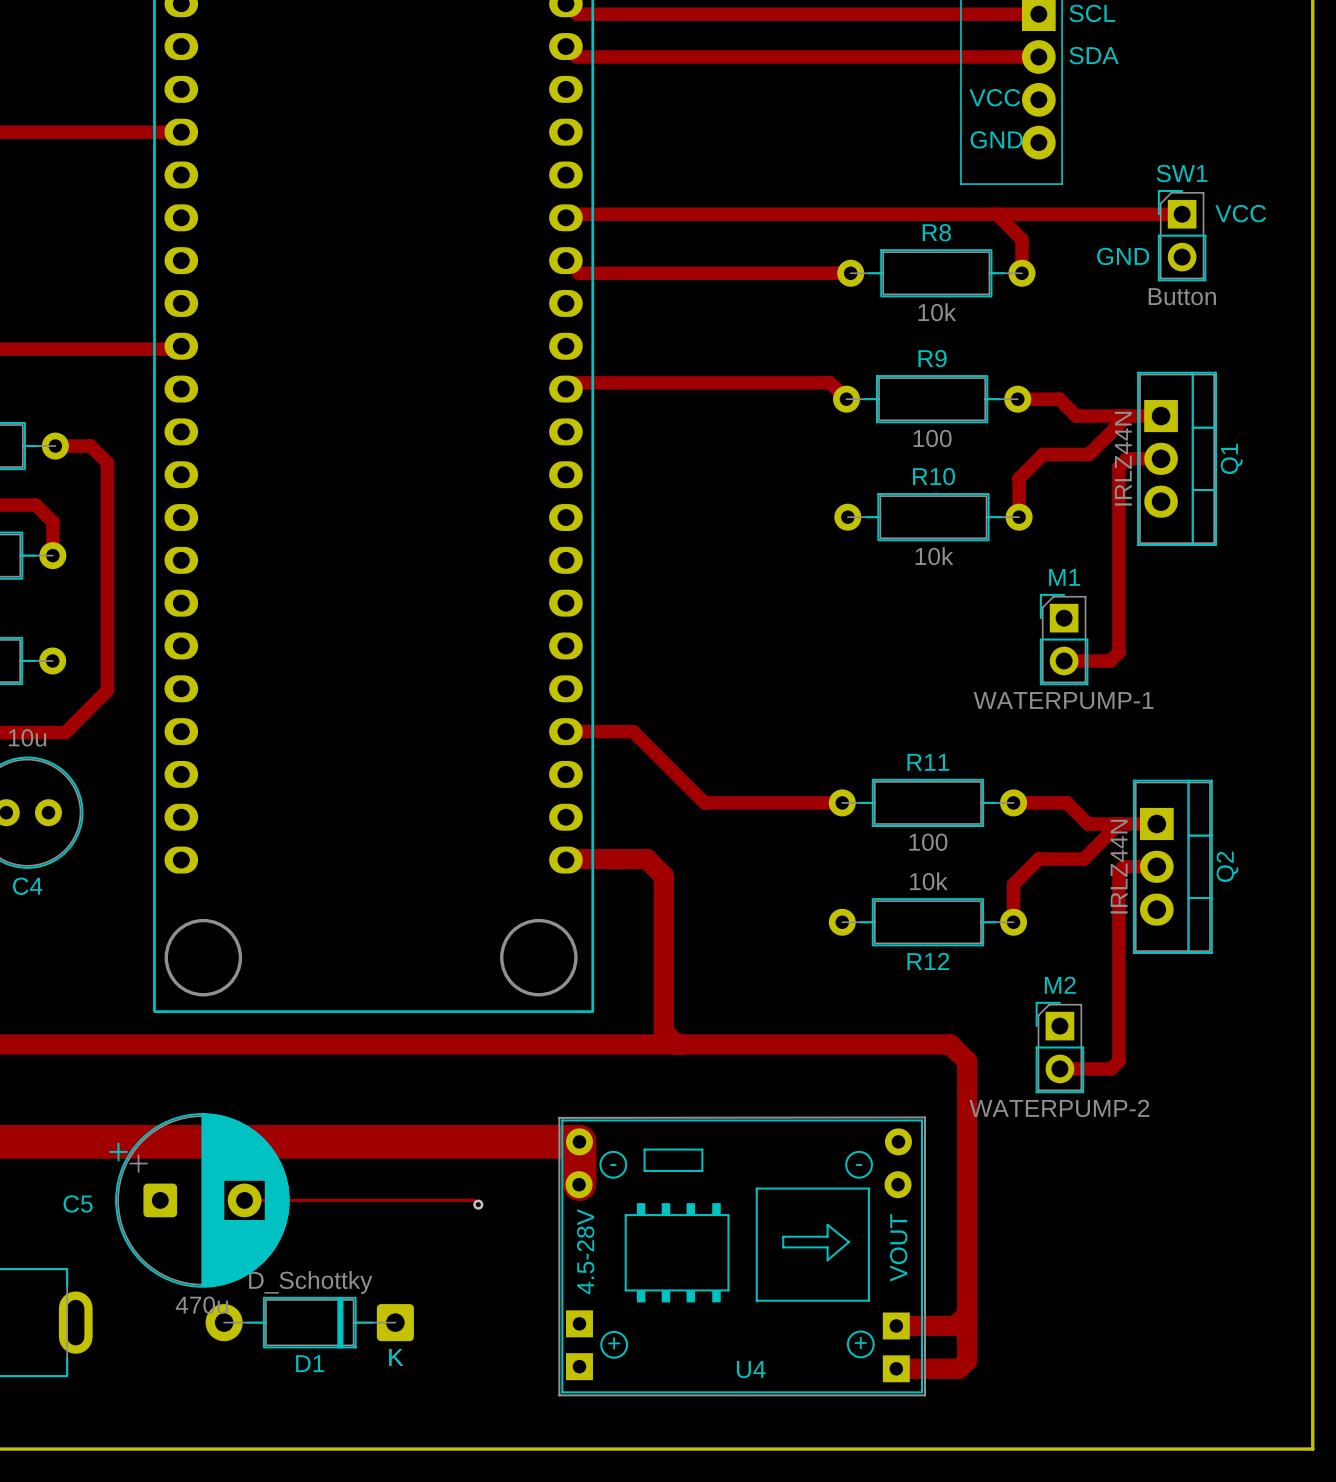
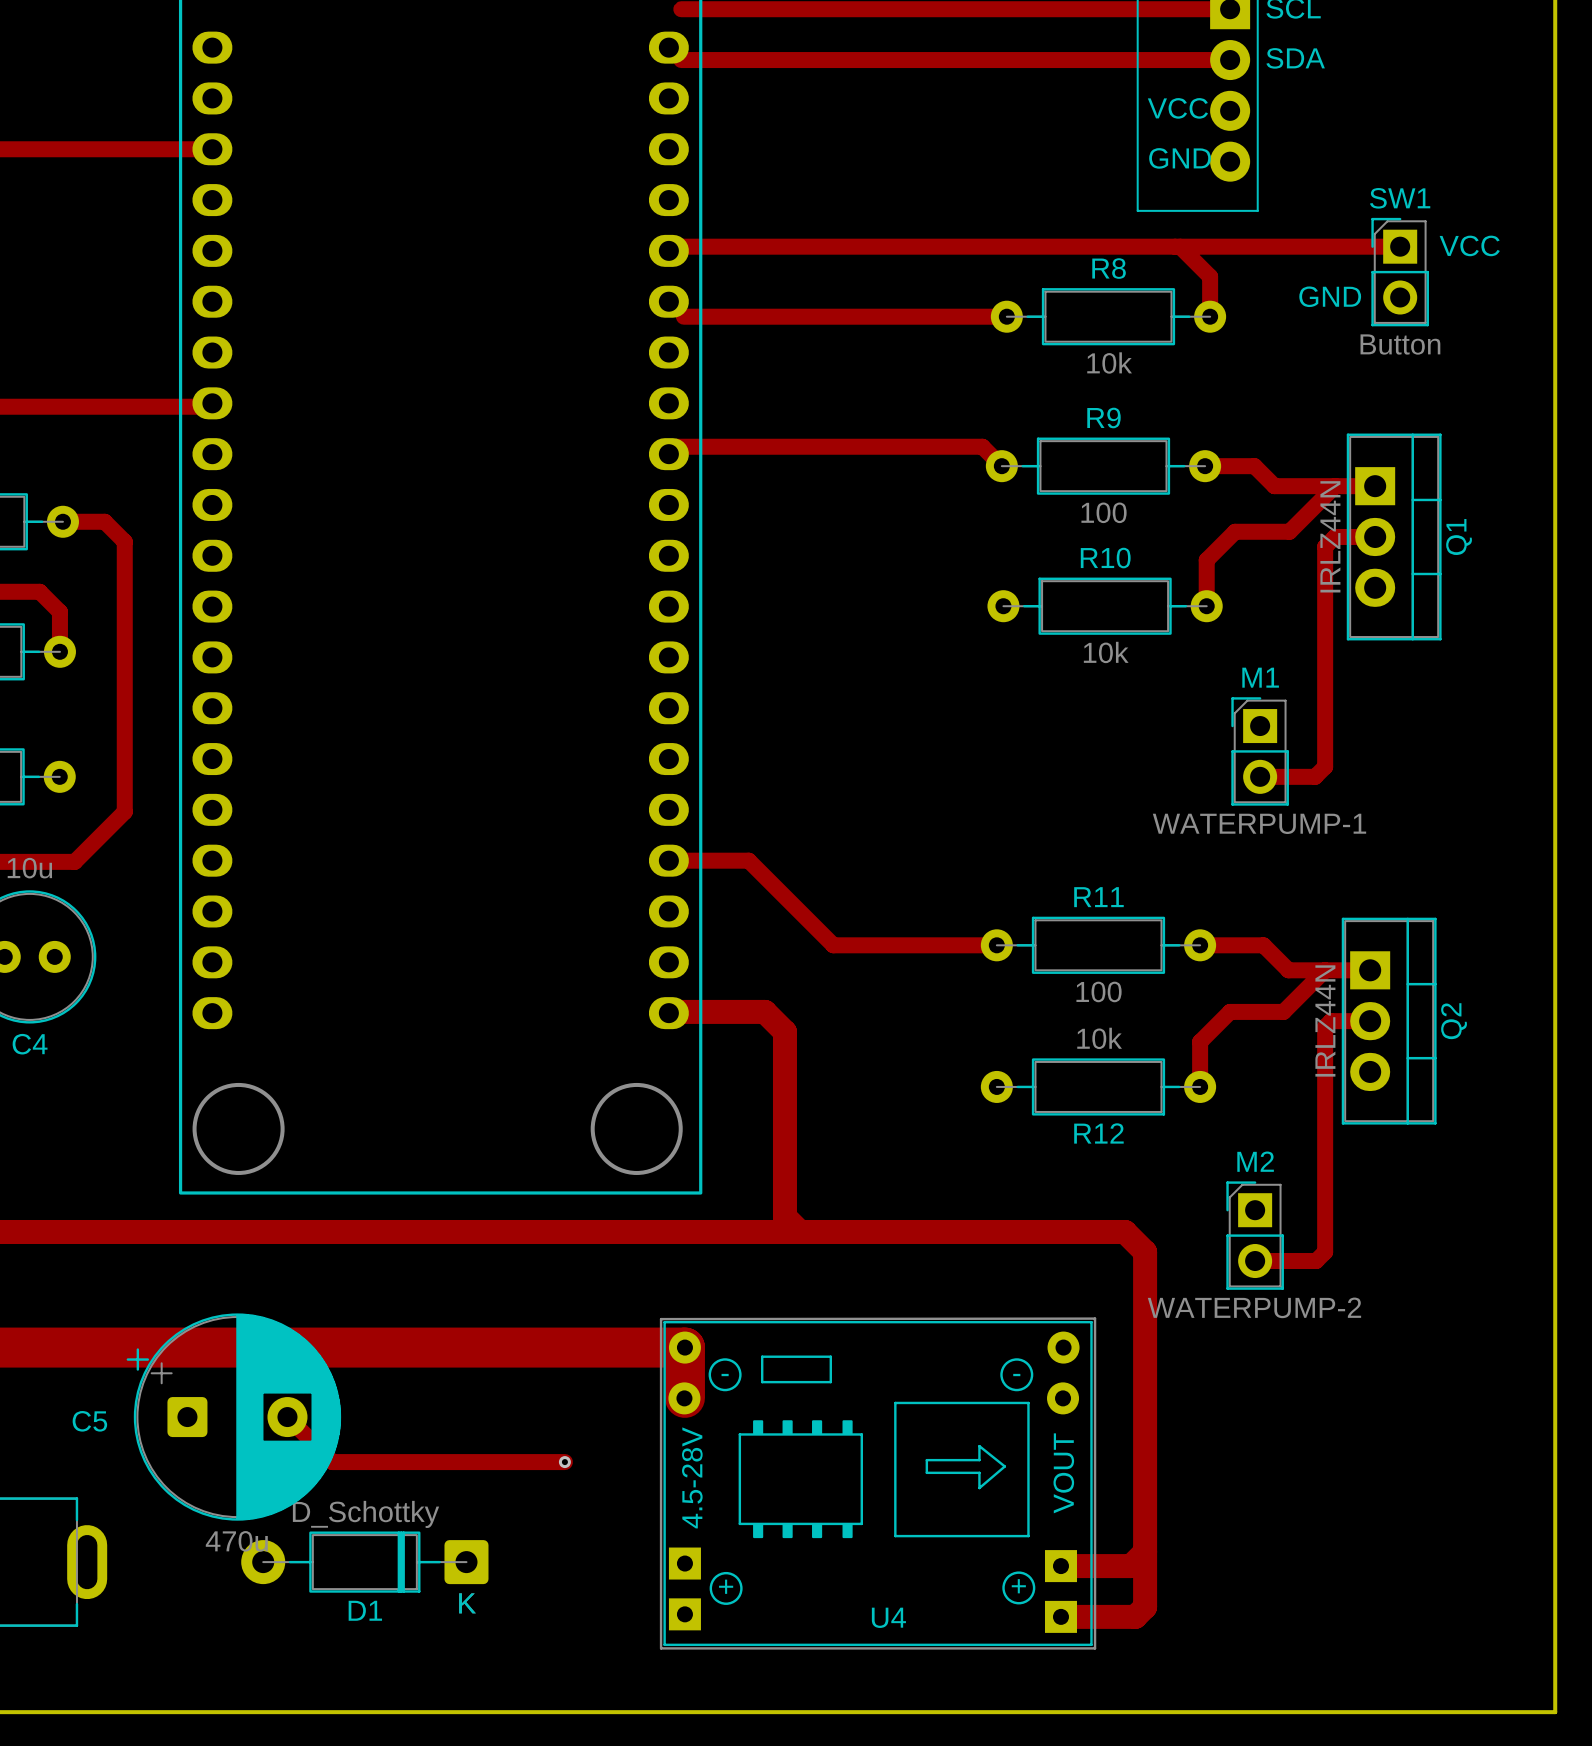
track: (244, 1200) (474, 1200) (478, 1204) -> (287, 1417) (332, 1462) (564, 1462)
via position: (478, 1204) -> (564, 1462)

